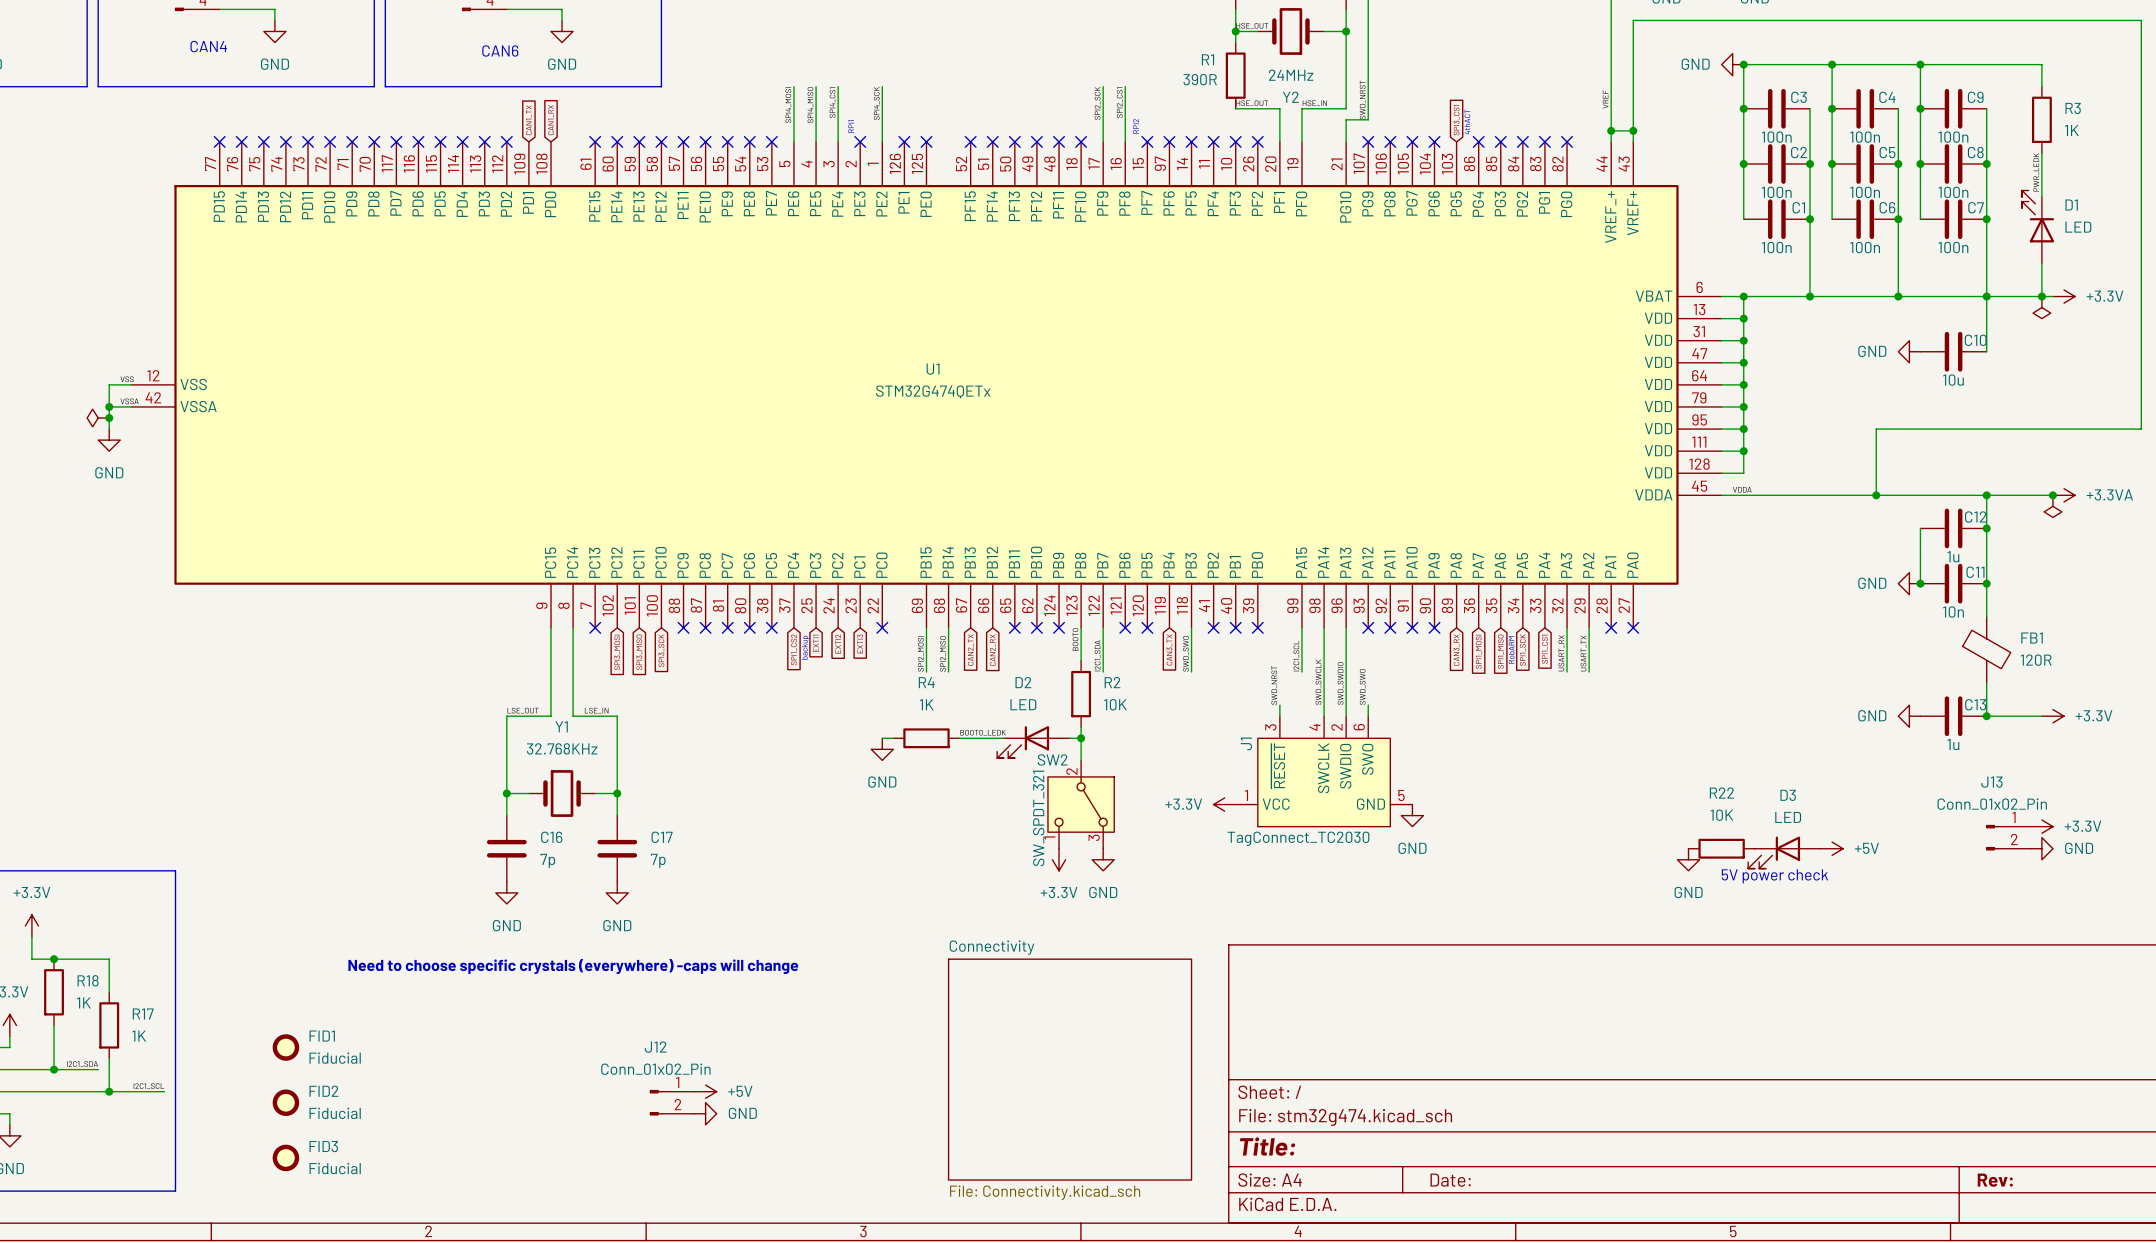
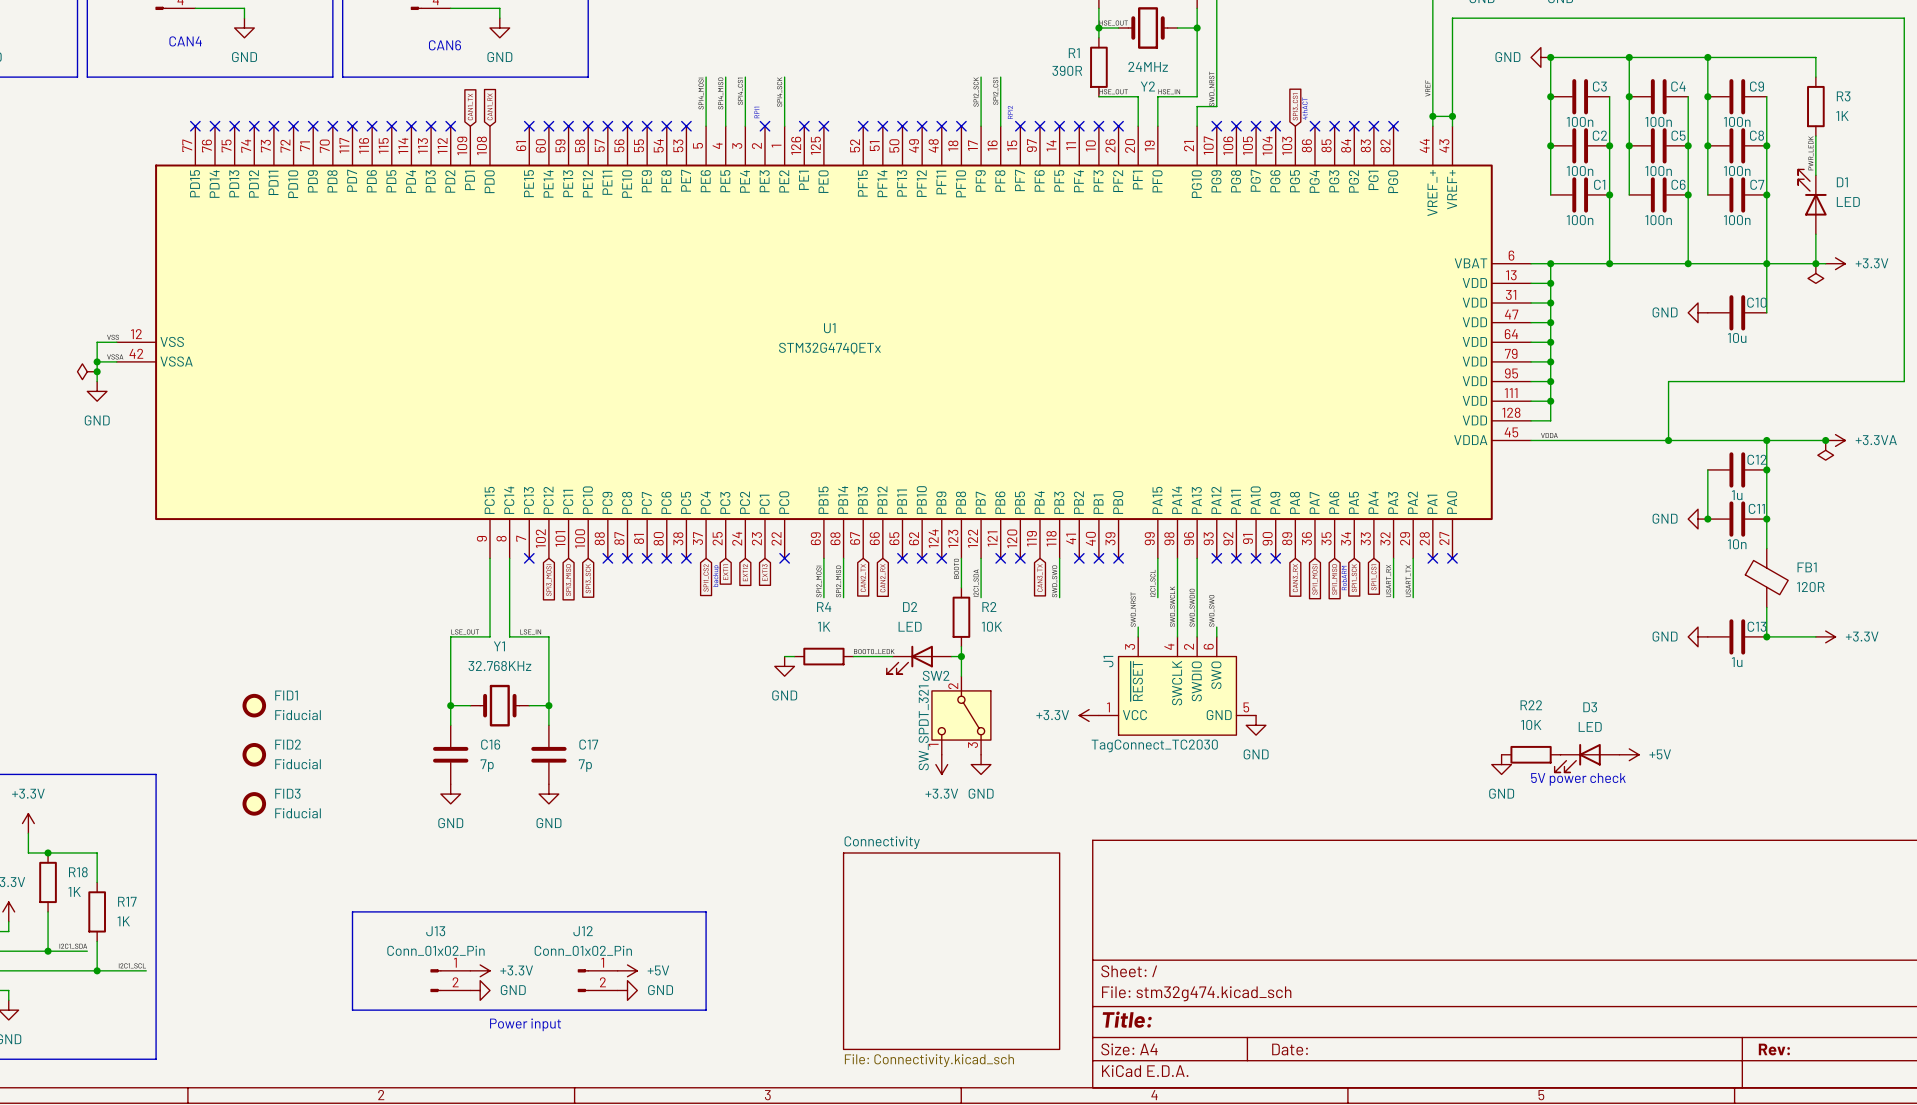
power symbol: +3.3V (2041, 826) -> none
J13 position: (2008, 837) -> (450, 980)
power symbol: GND (2041, 848) -> none
text: Need to choose specific crystals (everywhere) -caps will change (573, 966) -> none
line: none -> (352, 911) (706, 911) (706, 1010) (352, 1010) (352, 911)
FID1 position: (285, 1047) -> (254, 705)
power symbol: none -> +3.3V (480, 970)
FID2 position: (285, 1102) -> (254, 754)
power symbol: none -> GND (480, 990)
text: none -> Power input (525, 1024)
FID3 position: (285, 1157) -> (254, 803)

